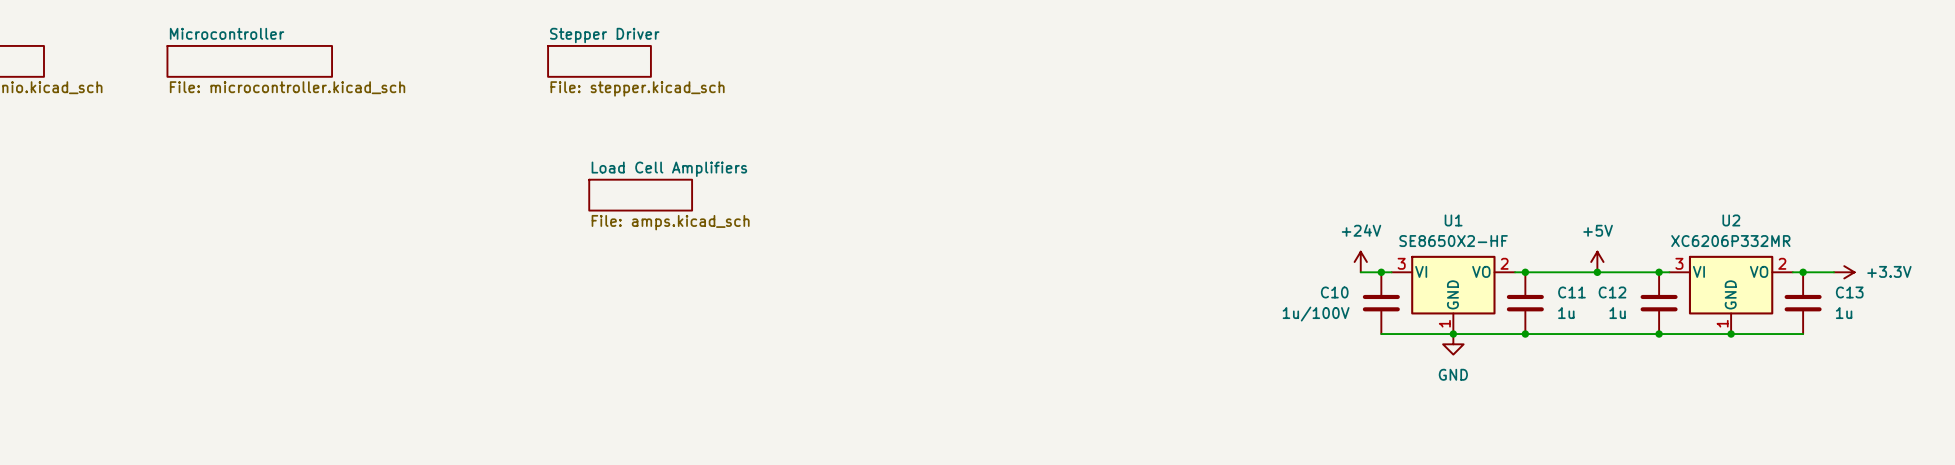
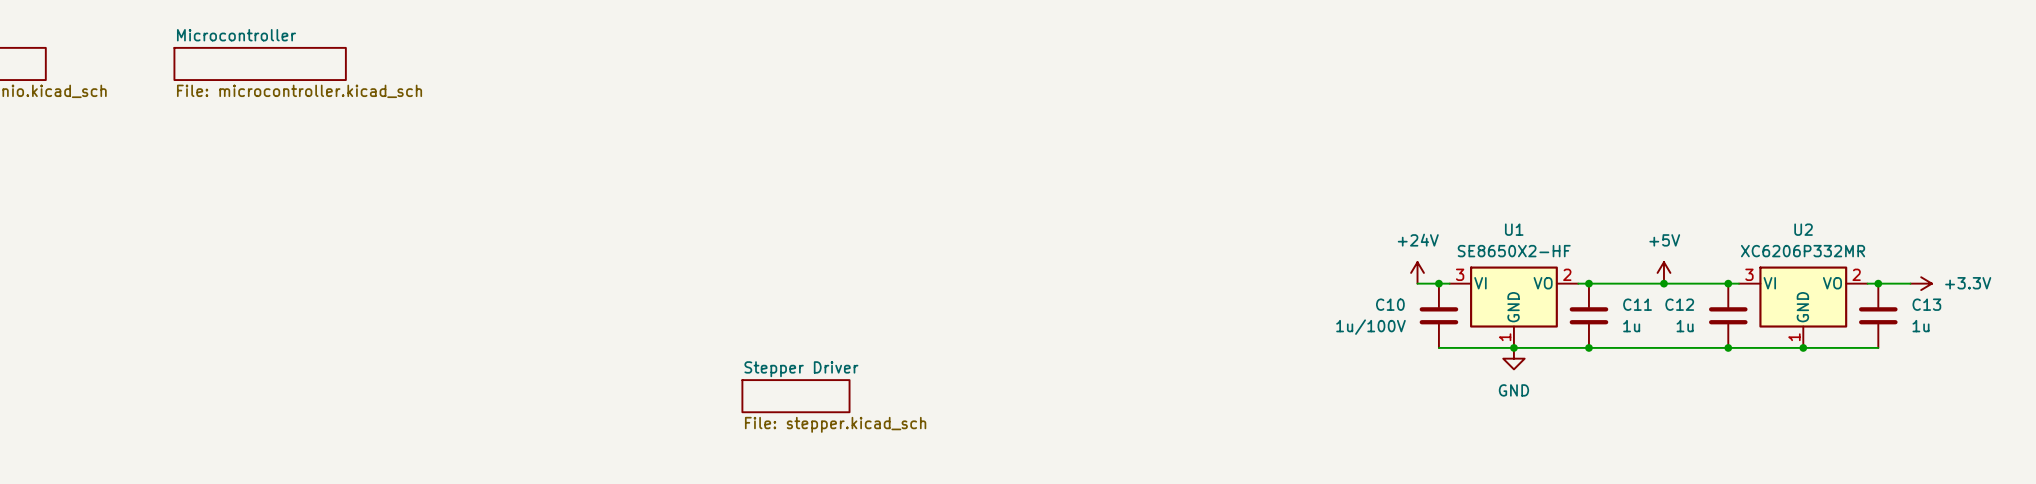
sheet Stepper Driver: File: stepper.kicad_sch (599, 61) -> none
sheet Load Cell Amplifiers: File: amps.kicad_sch (640, 195) -> none
sheet Stepper Driver: none -> File: stepper.kicad_sch (795, 396)

